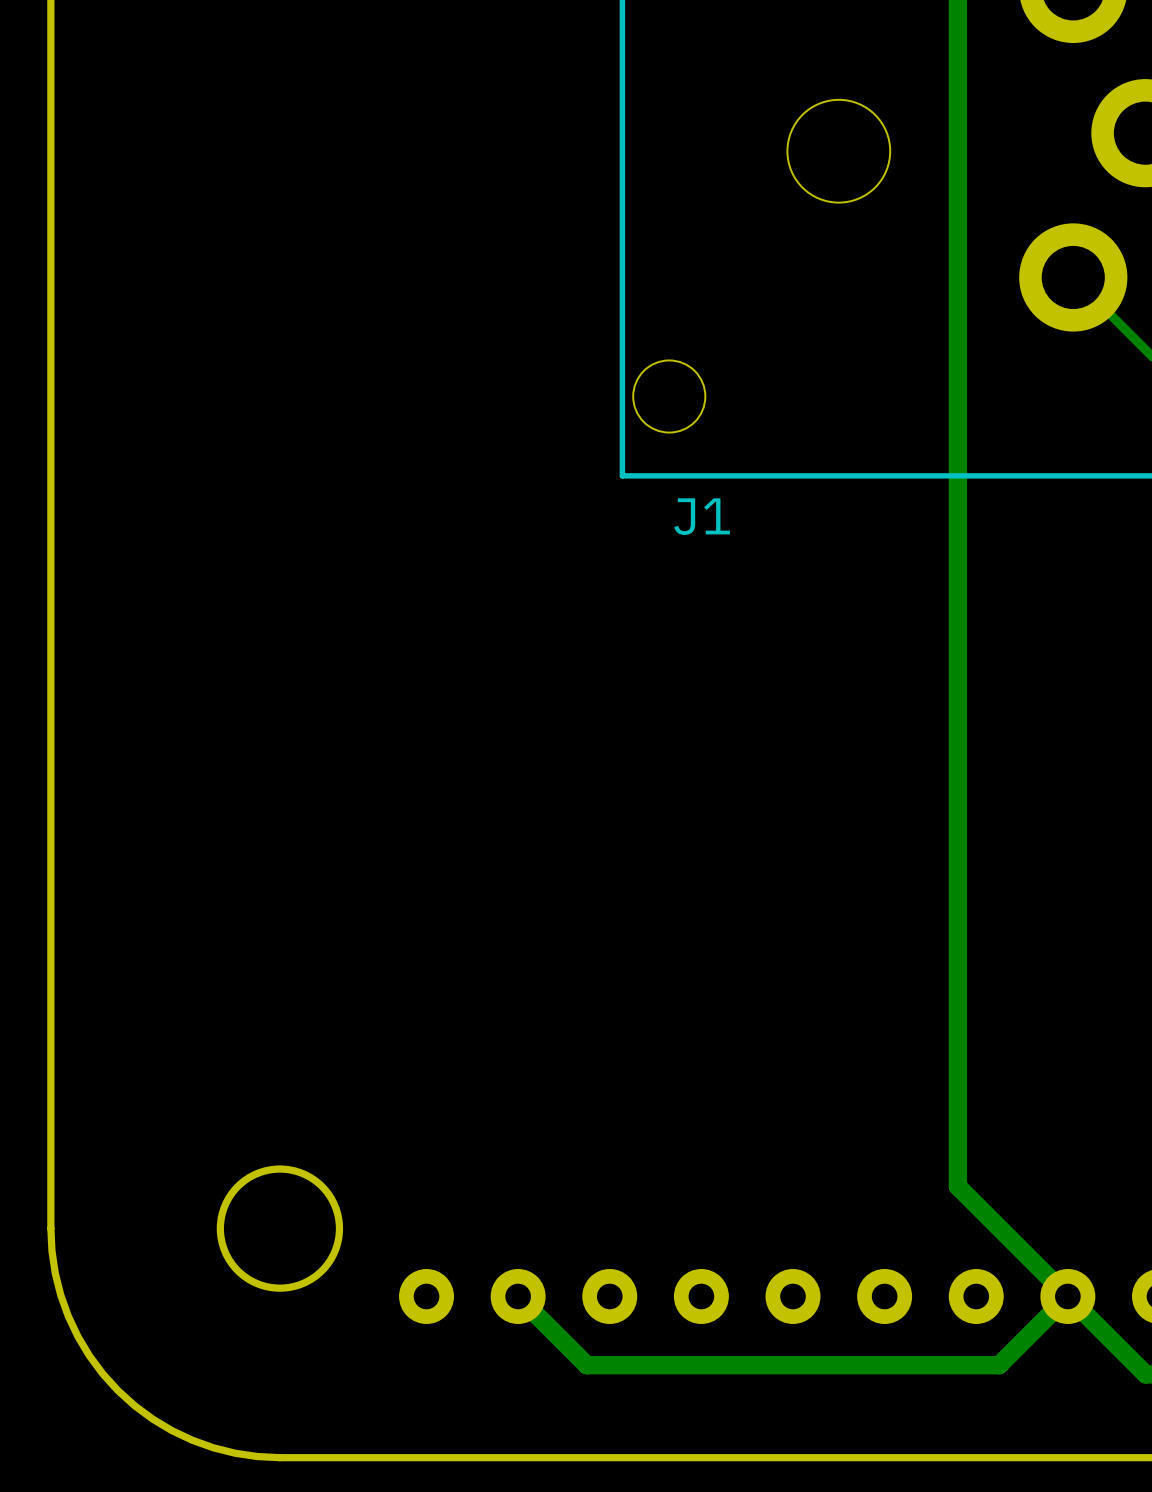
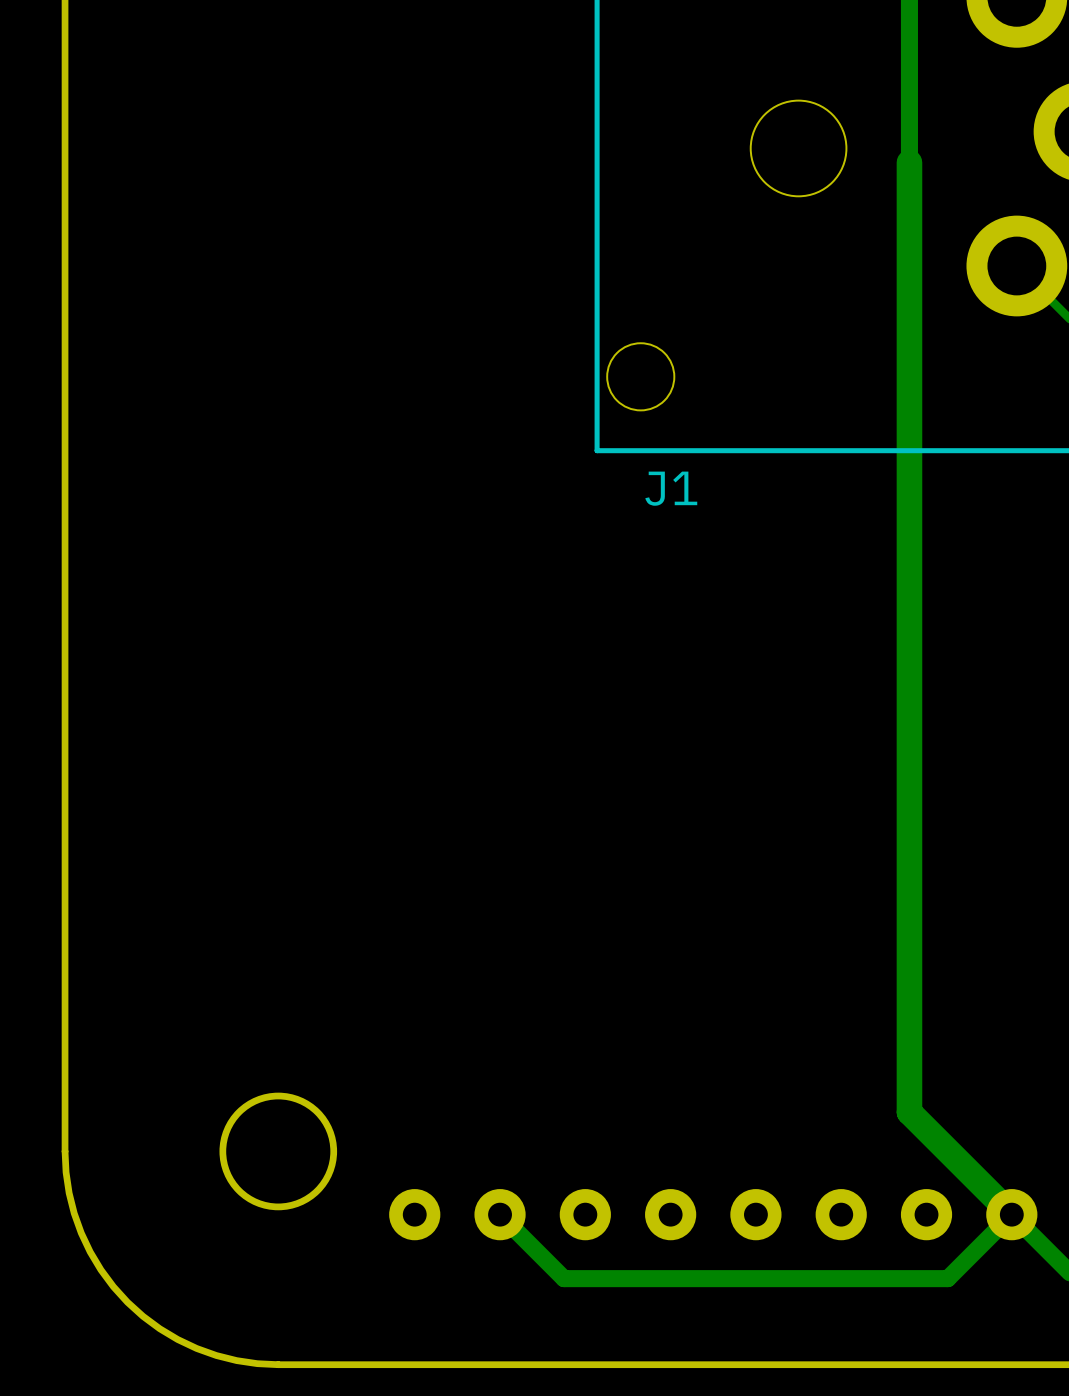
bottom track width: thin (957, 166) (957, 1186) (1067, 1296) -> thick (909, 162) (909, 1112) (1011, 1214)

